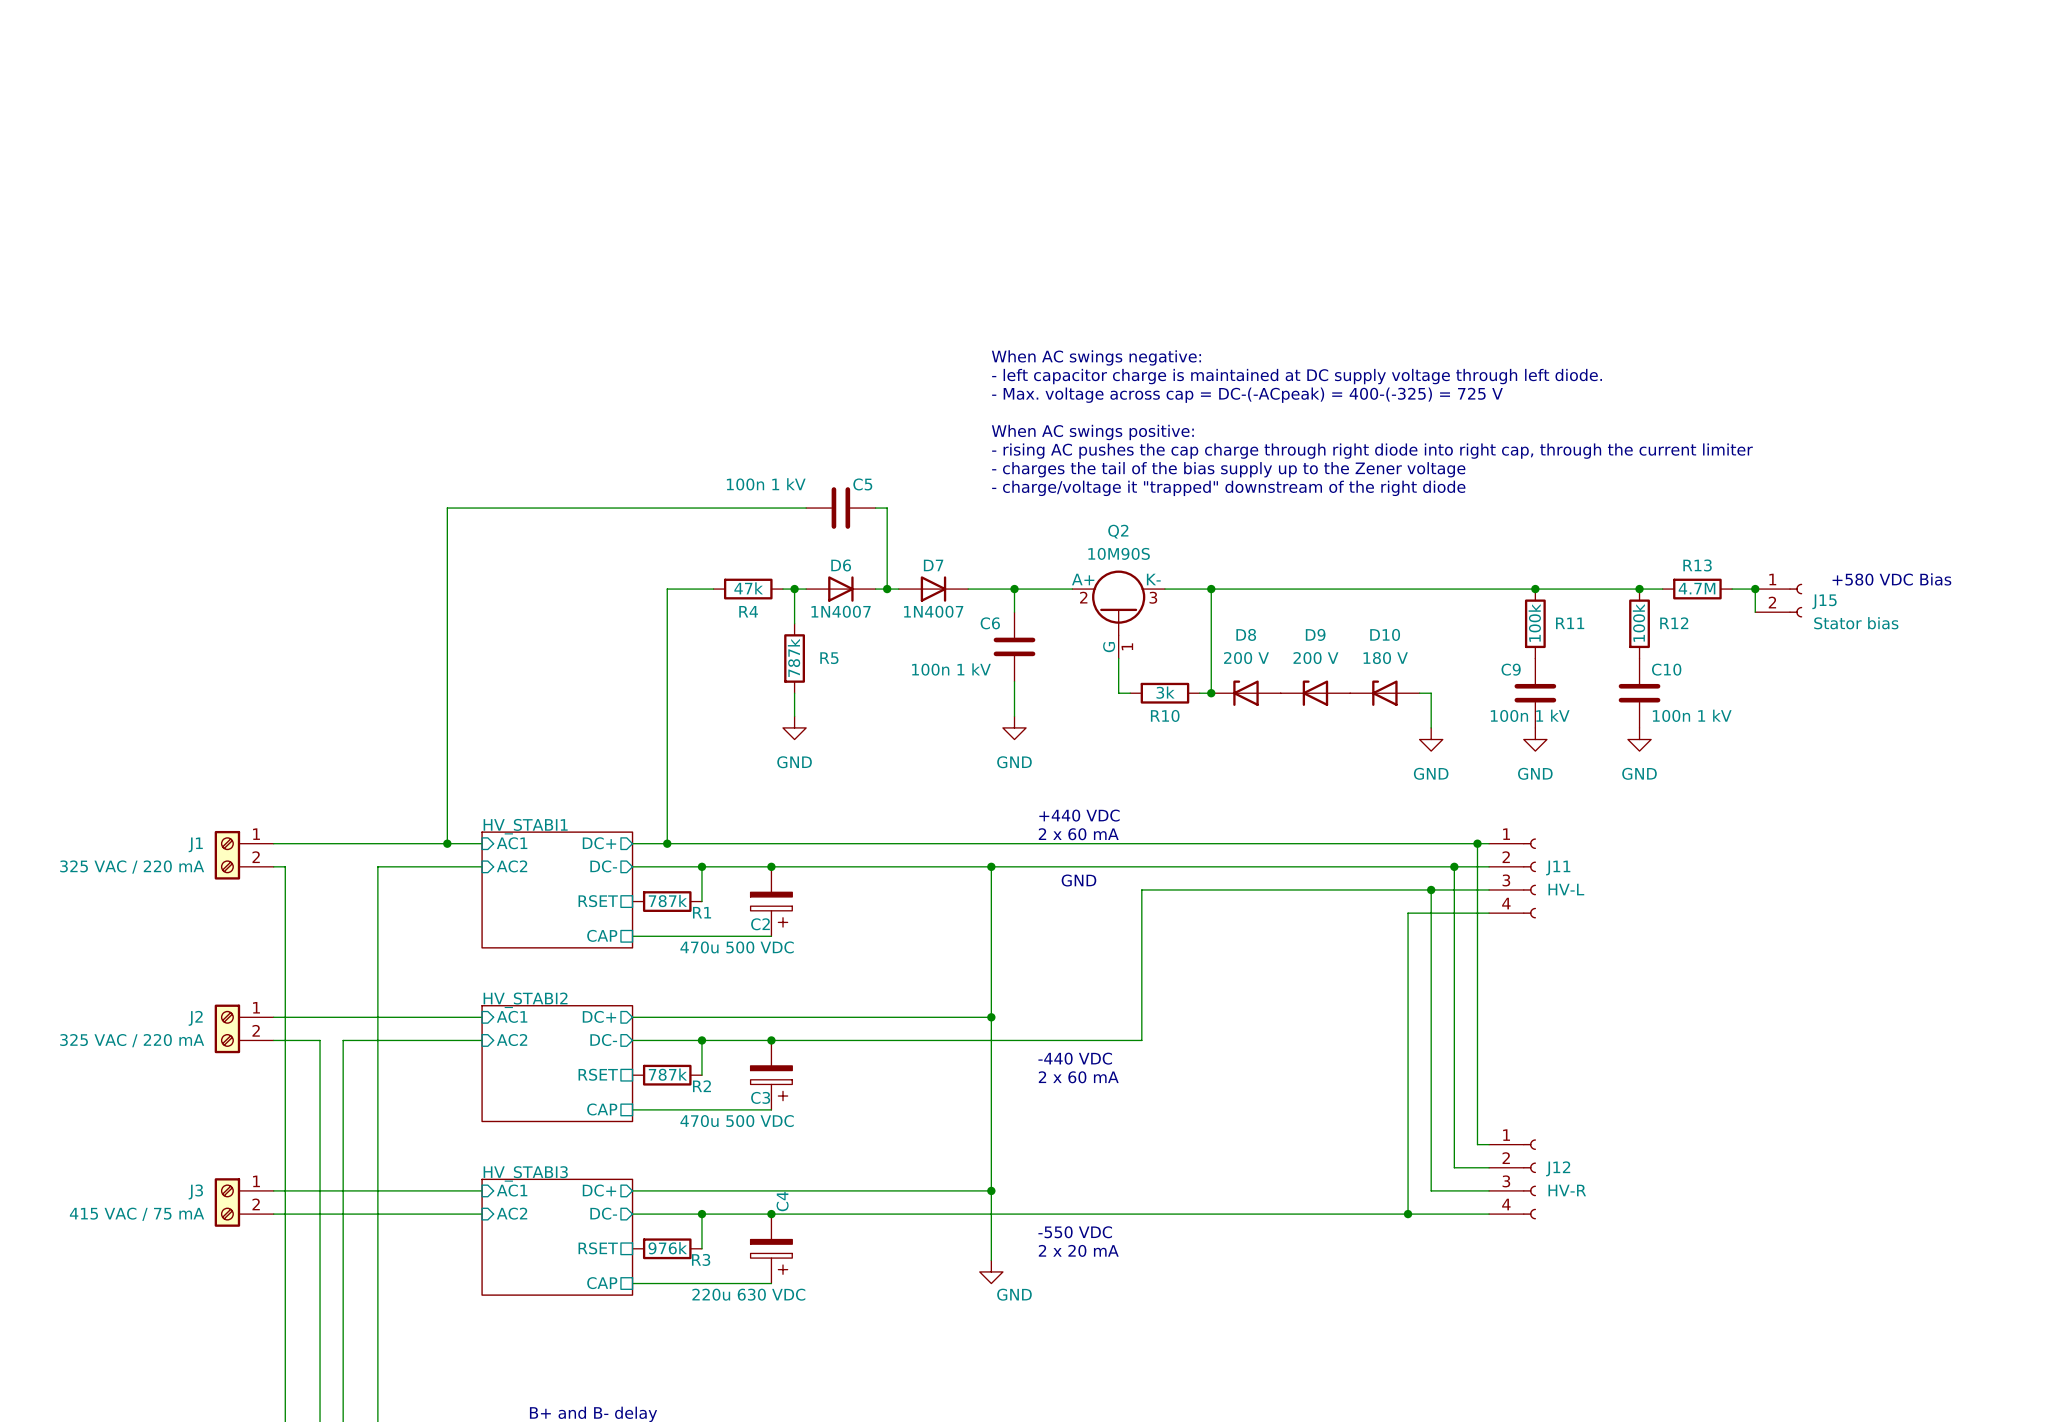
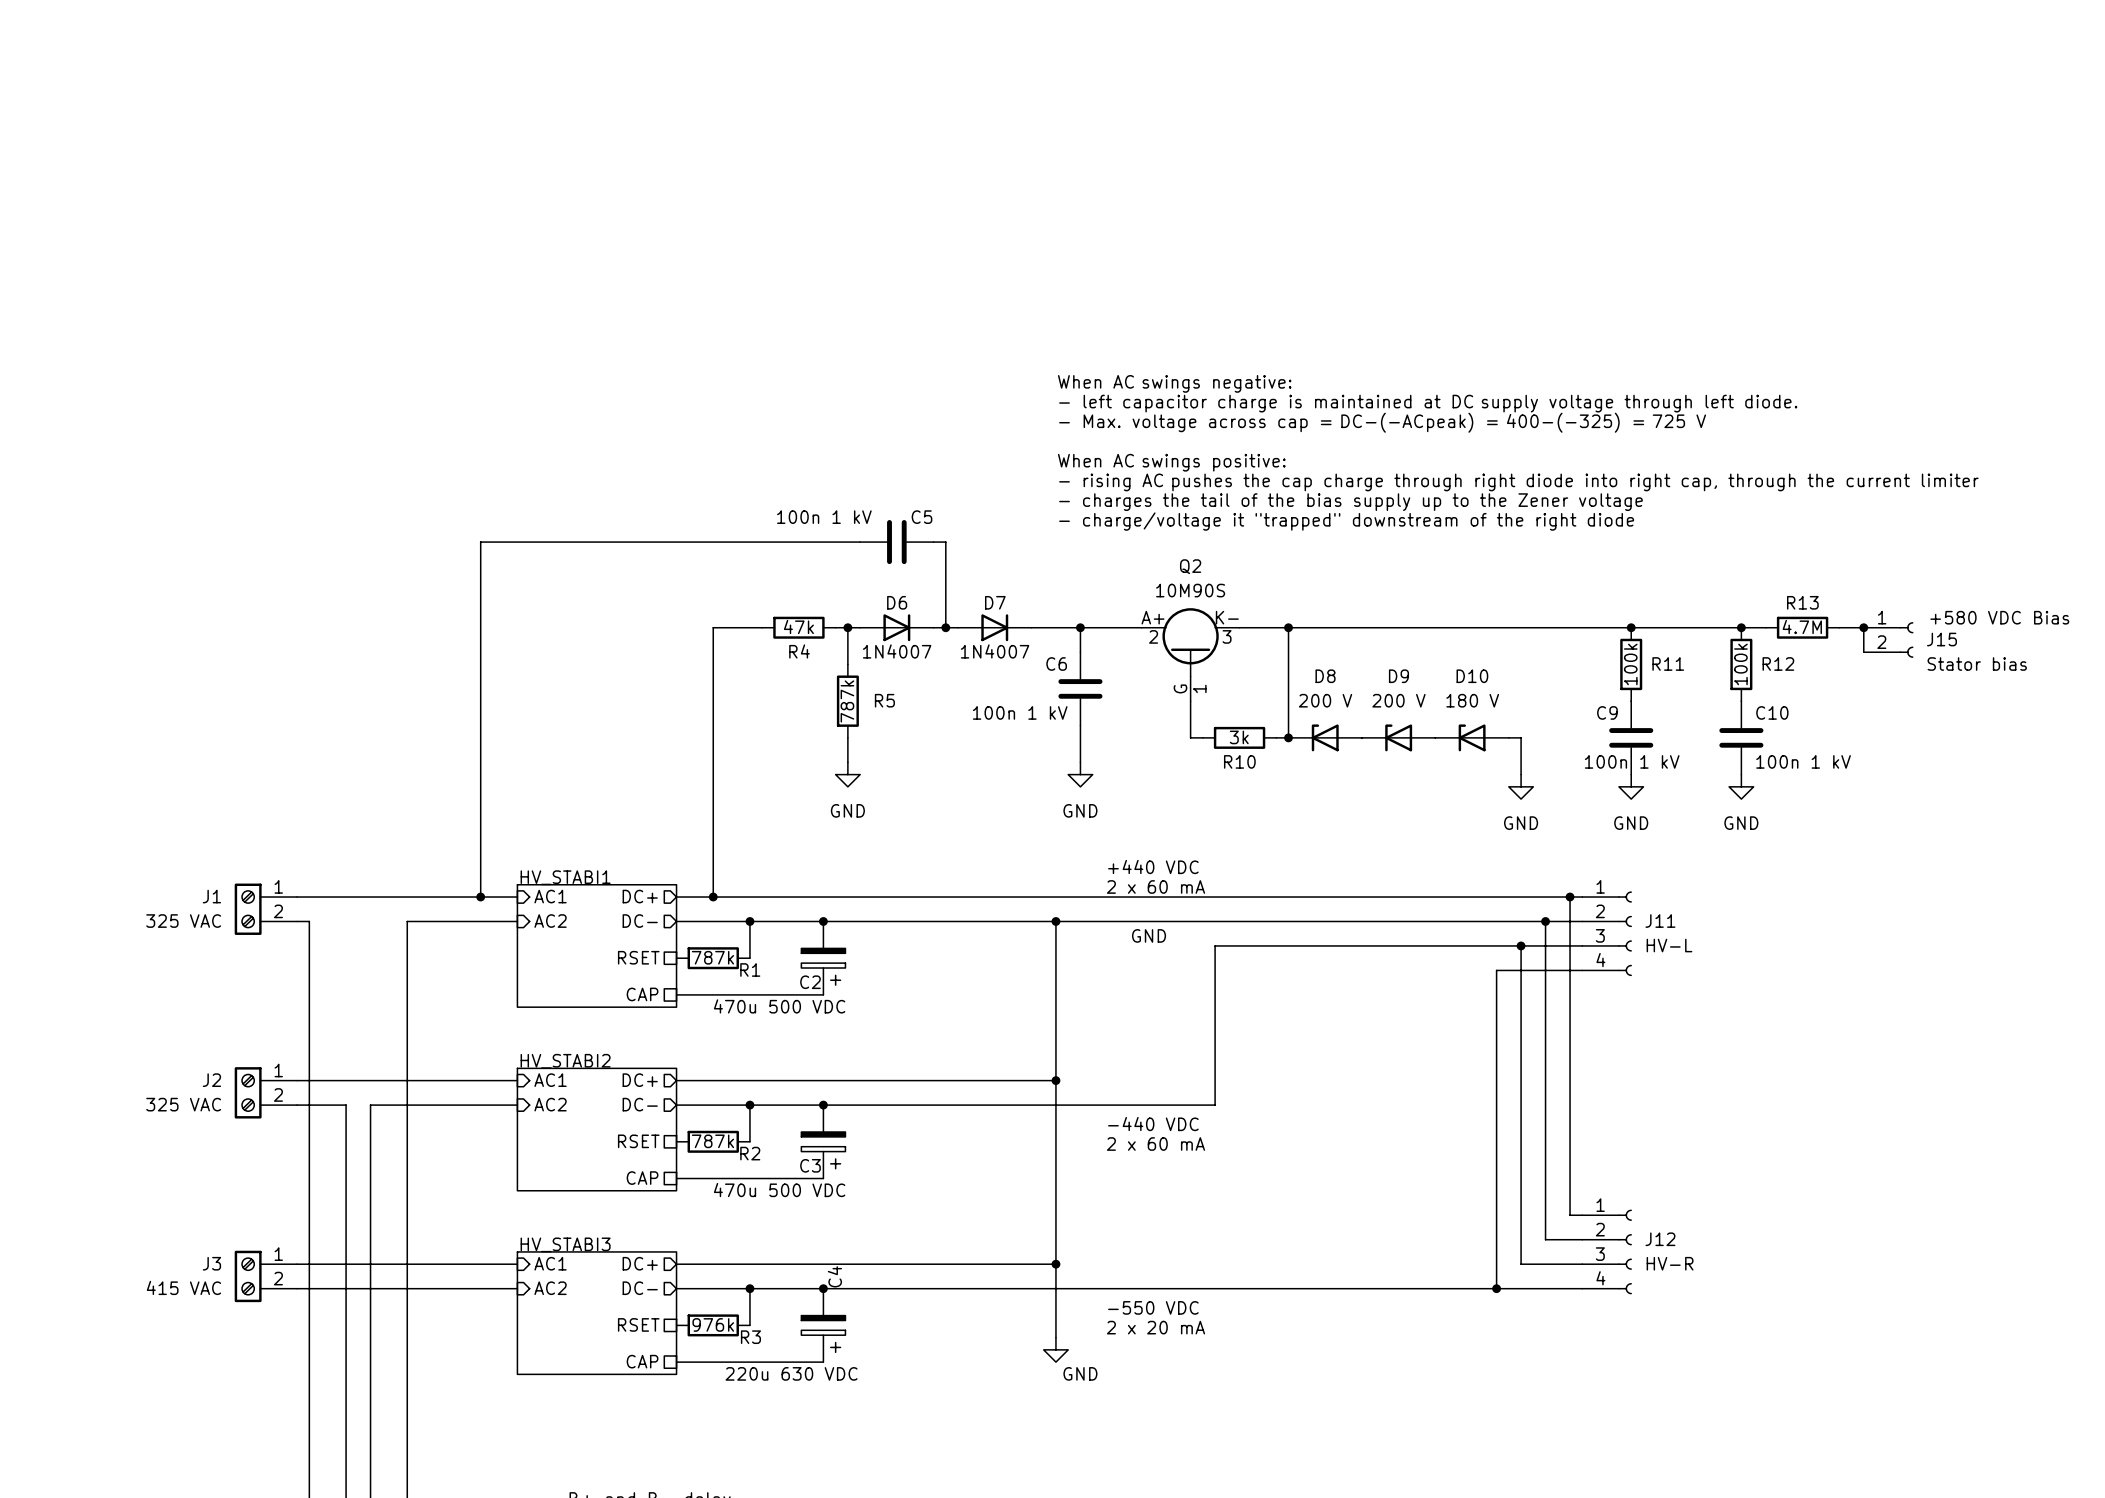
J1 value: 325 VAC / 220 mA (132, 867) -> 325 VAC (183, 921)
J2 value: 325 VAC / 220 mA (132, 1040) -> 325 VAC (183, 1104)
J3 value: 415 VAC / 75 mA (137, 1214) -> 415 VAC (183, 1287)

